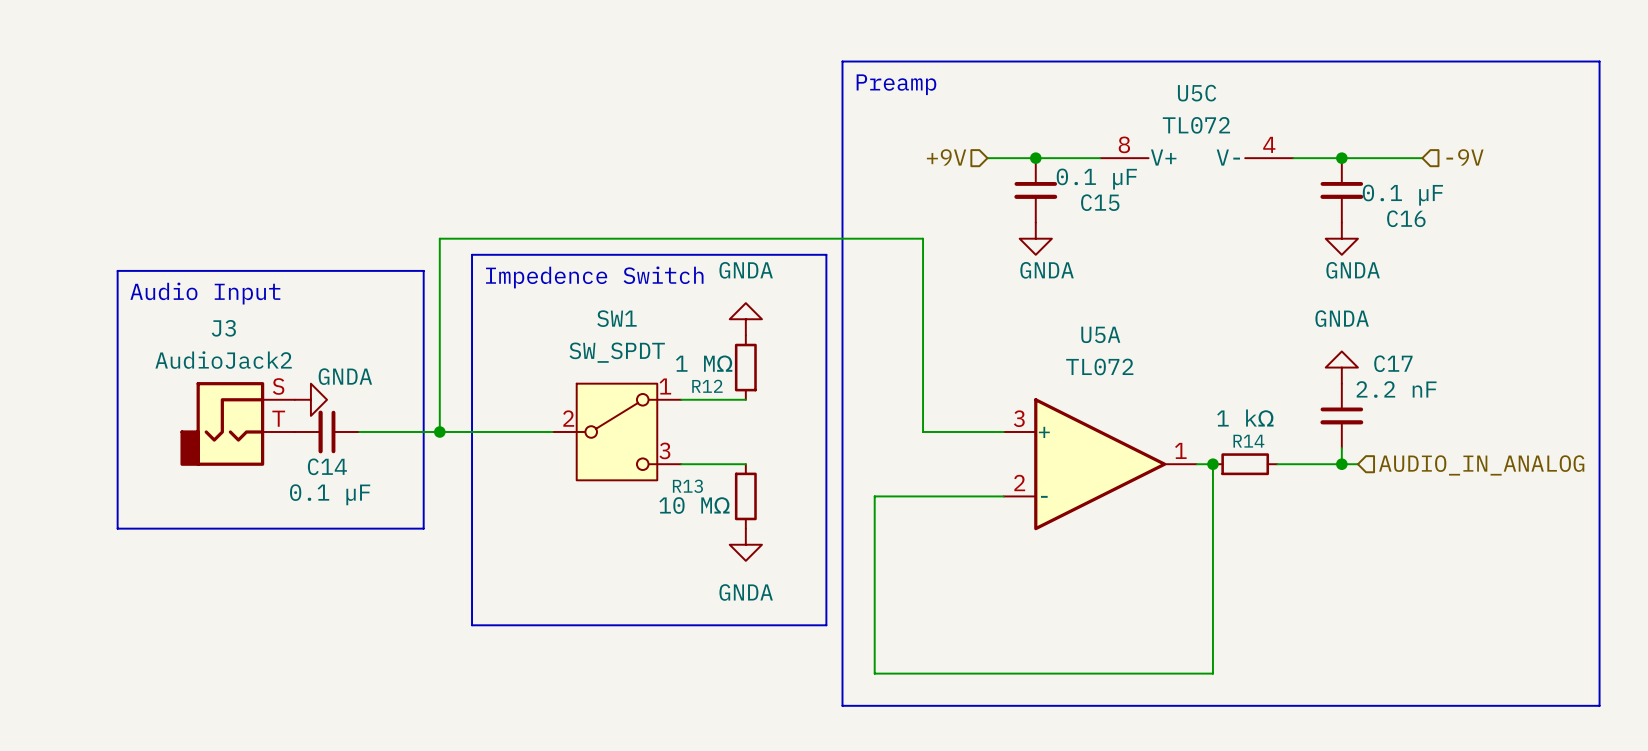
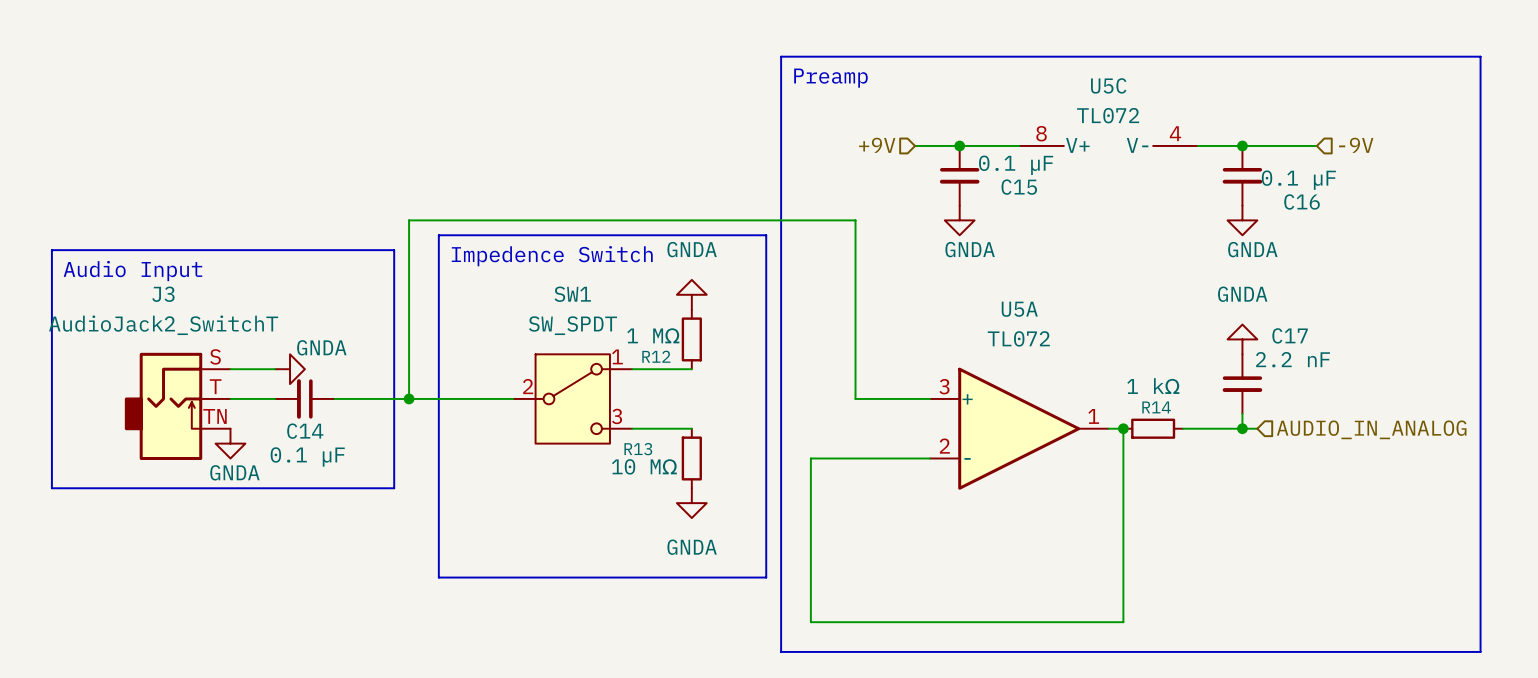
line: (117, 270) (117, 528) -> (111, 250) (51, 250) (51, 488) (111, 488)
text position: Audio Input (205, 293) -> Audio Input (132, 271)
J3 name position: J3 (223, 328) -> J3 (163, 294)
J3 value: AudioJack2 (223, 360) -> AudioJack2_SwitchT (163, 325)
J3 symbol: [180, 382, 295, 466] -> [124, 352, 231, 460]
power symbol: none -> GNDA (230, 443)

